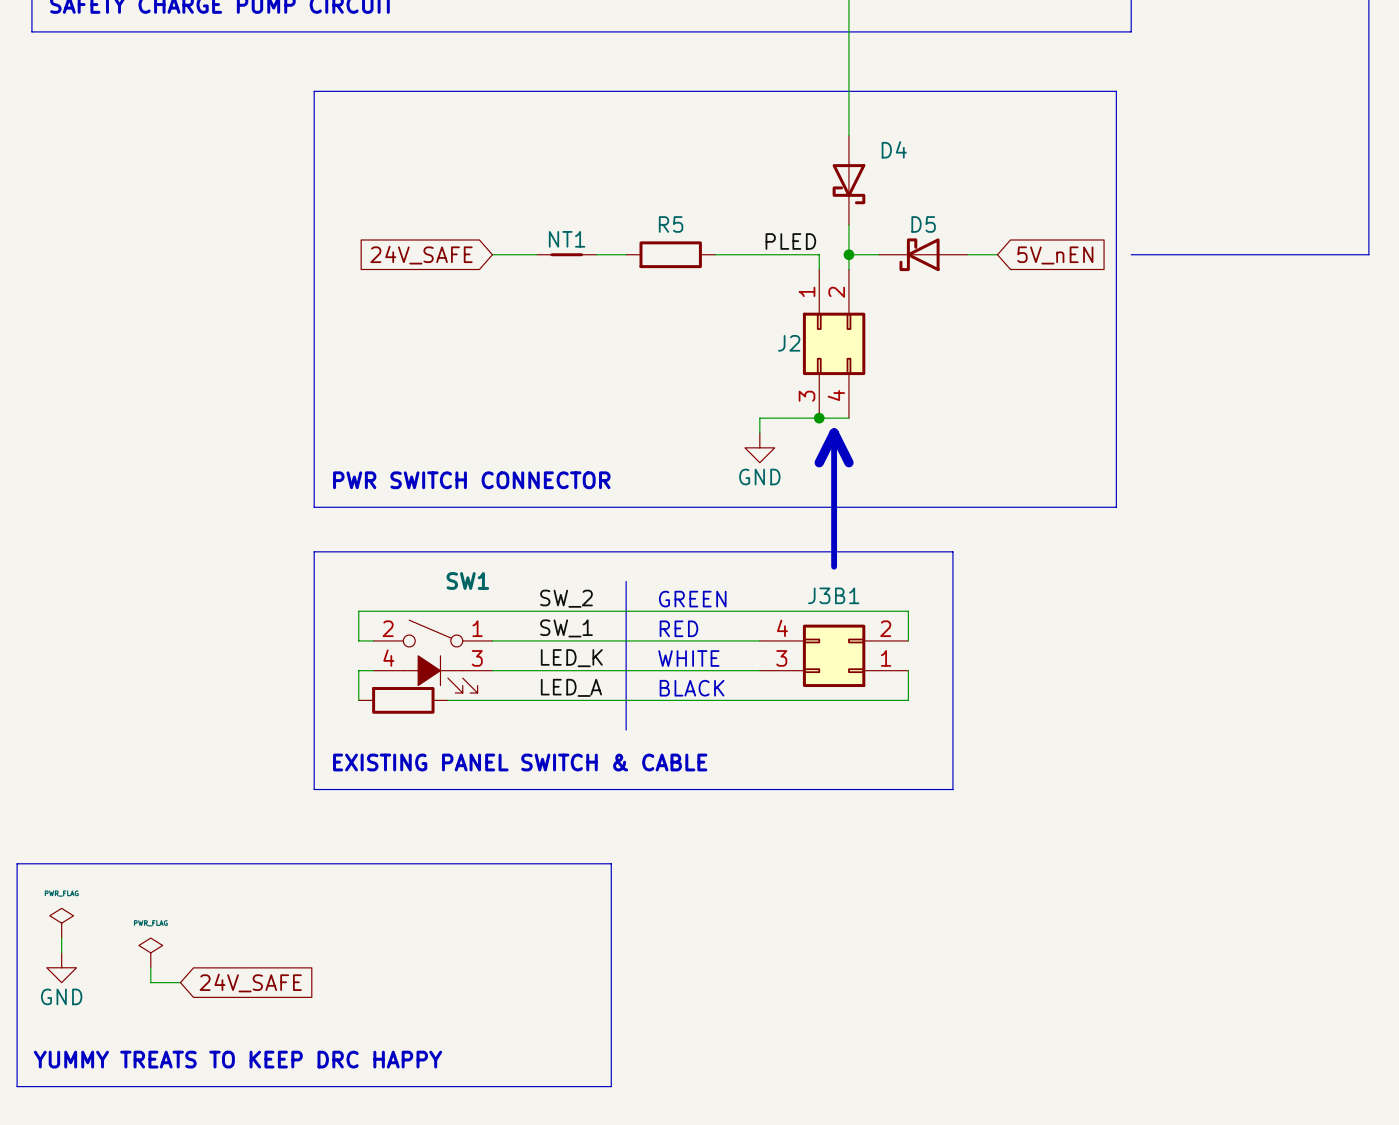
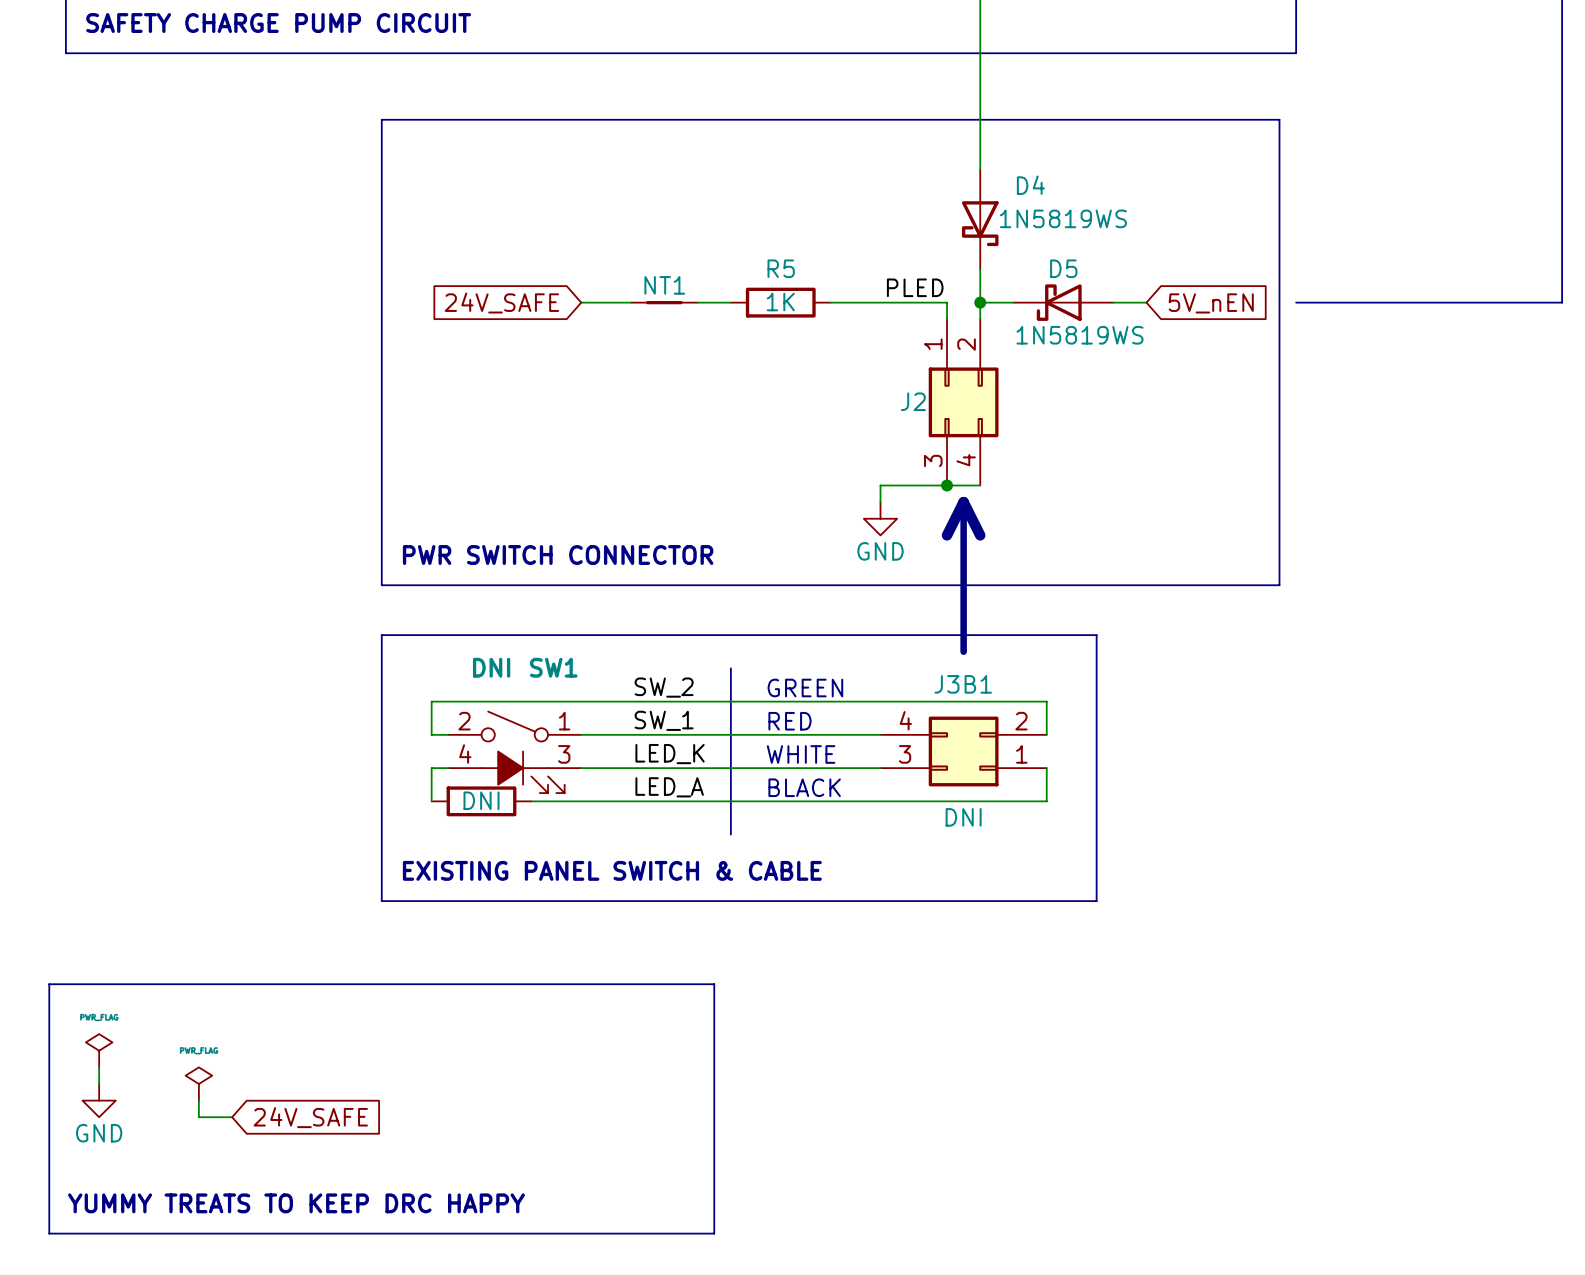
D4 value: none -> 1N5819WS (1063, 218)
R5 value: none -> 1K (780, 302)
D5 value: none -> 1N5819WS (1080, 335)
SW1 value: none -> DNI (491, 667)
part value: none -> DNI (481, 800)
J3B1 value: none -> DNI (963, 817)

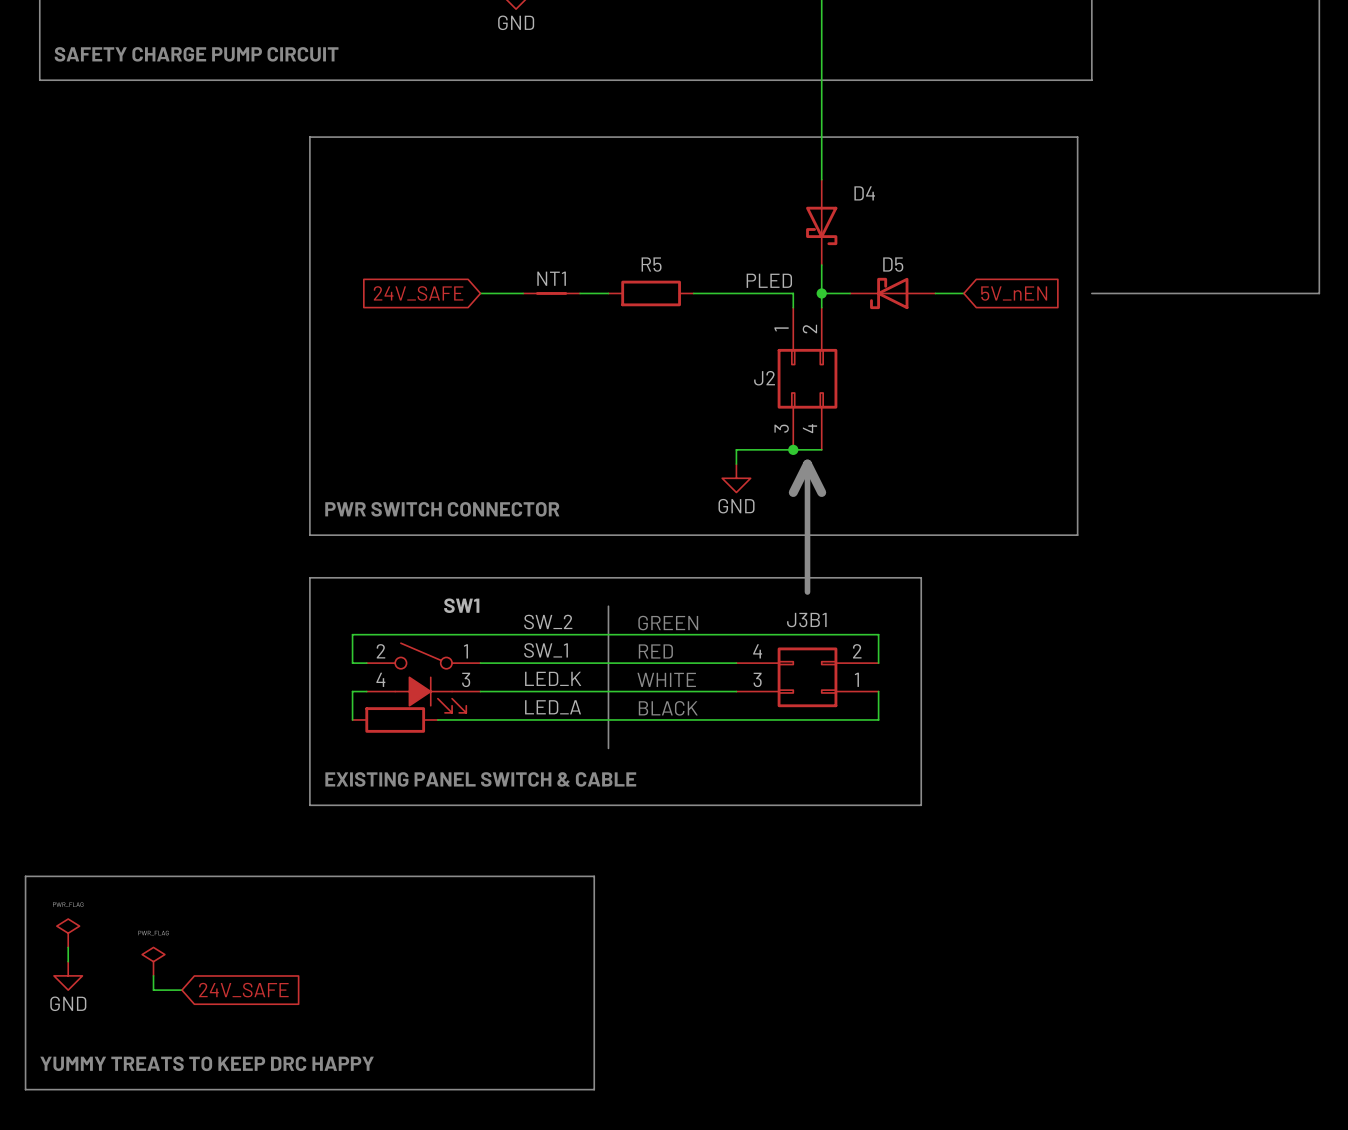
D4 value: 1N5819WS (1063, 218) -> none
R5 value: 1K (780, 302) -> none
D5 value: 1N5819WS (1080, 335) -> none
SW1 value: DNI (491, 667) -> none
part value: DNI (481, 800) -> none
J3B1 value: DNI (963, 817) -> none

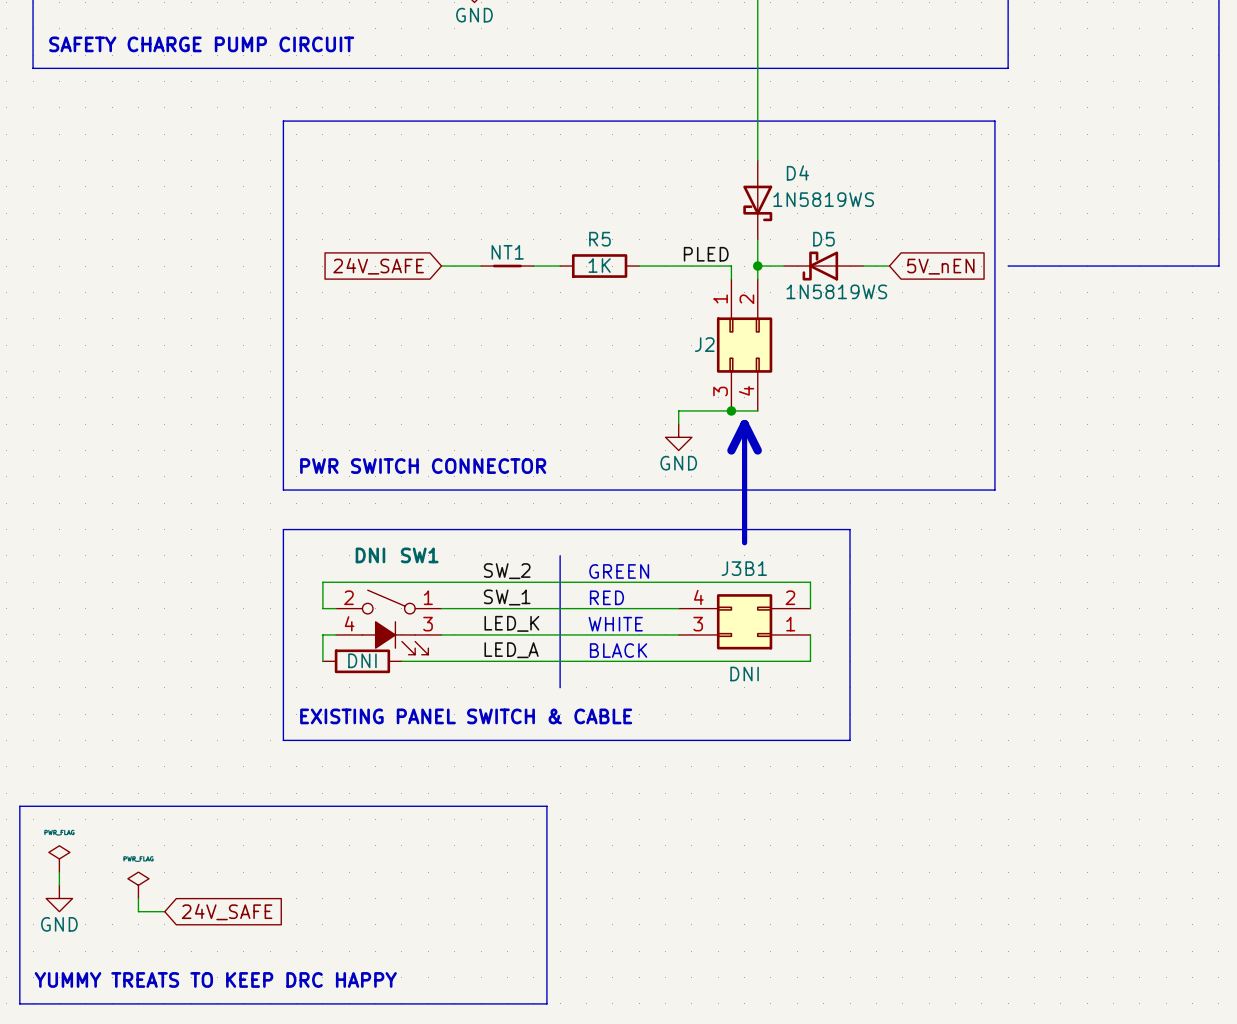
D4 value: none -> 1N5819WS (823, 199)
R5 value: none -> 1K (599, 265)
D5 value: none -> 1N5819WS (836, 291)
SW1 value: none -> DNI (370, 555)
part value: none -> DNI (362, 660)
J3B1 value: none -> DNI (744, 674)

